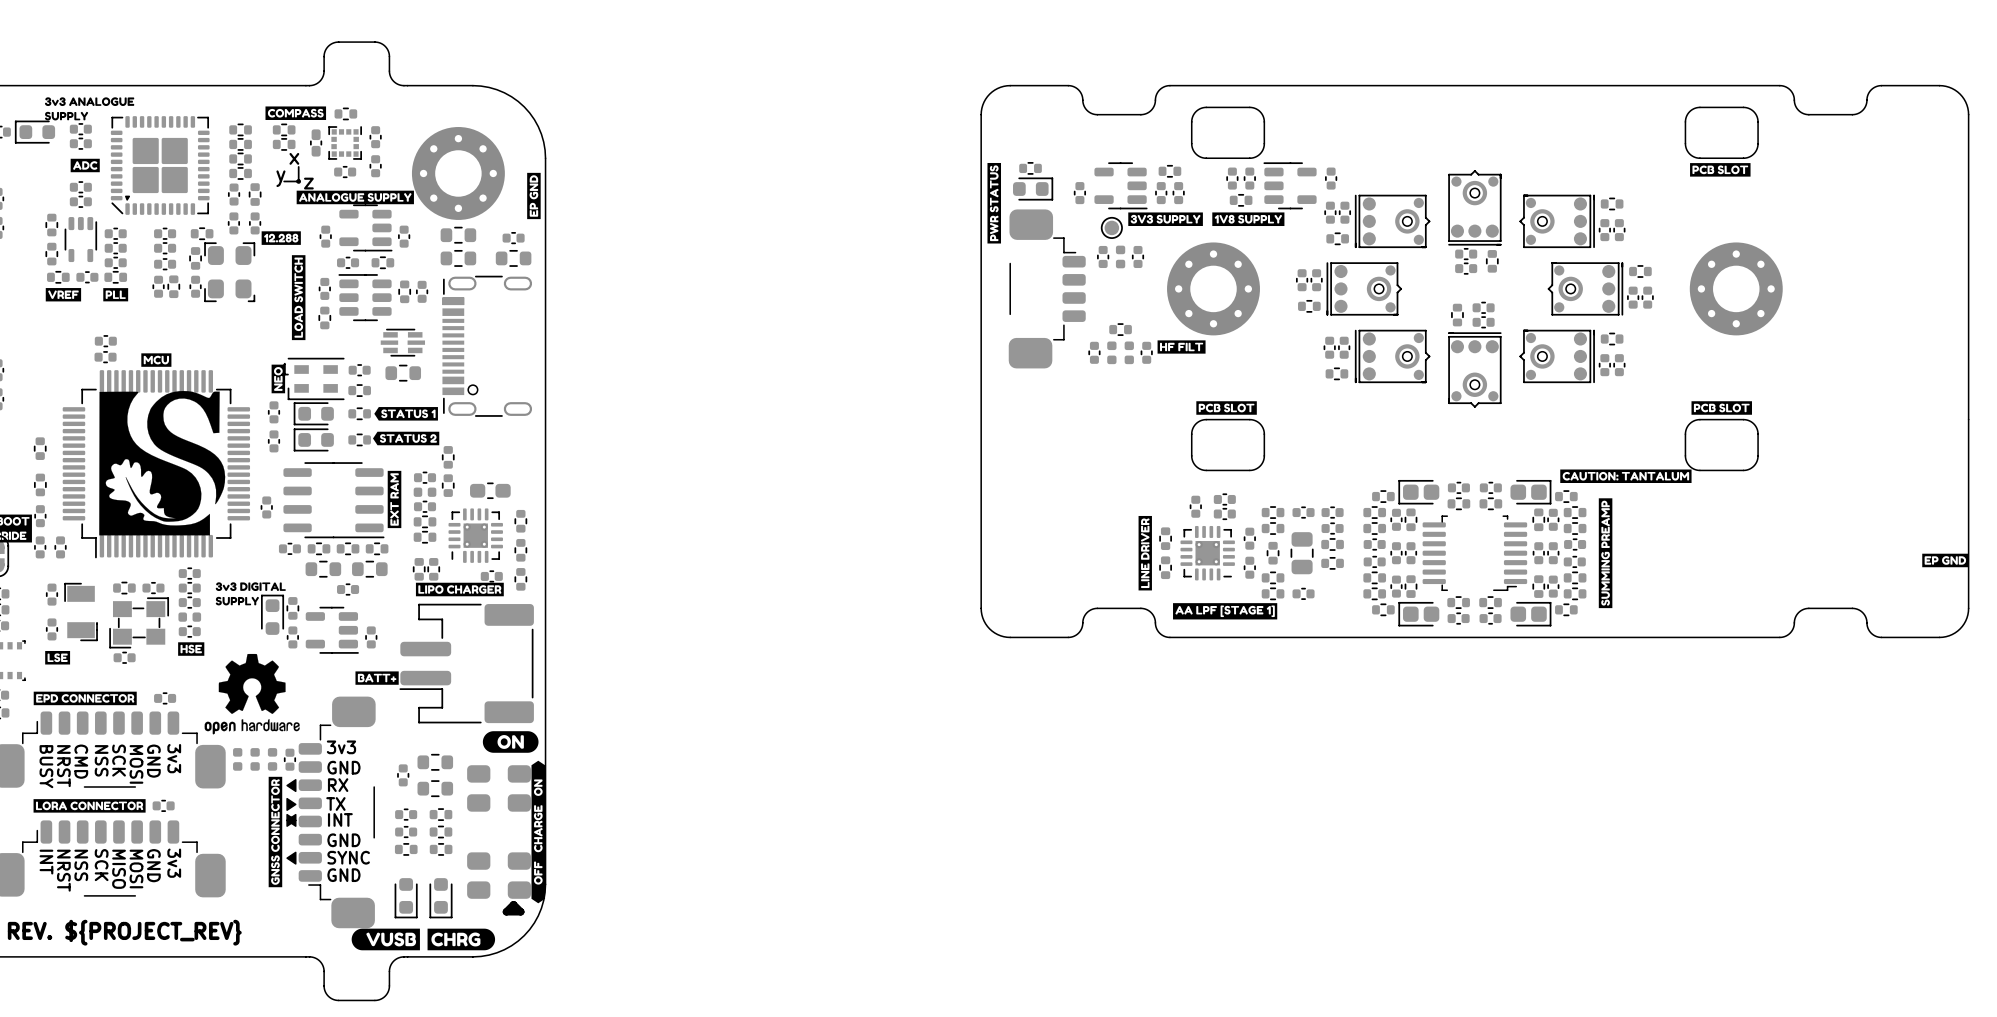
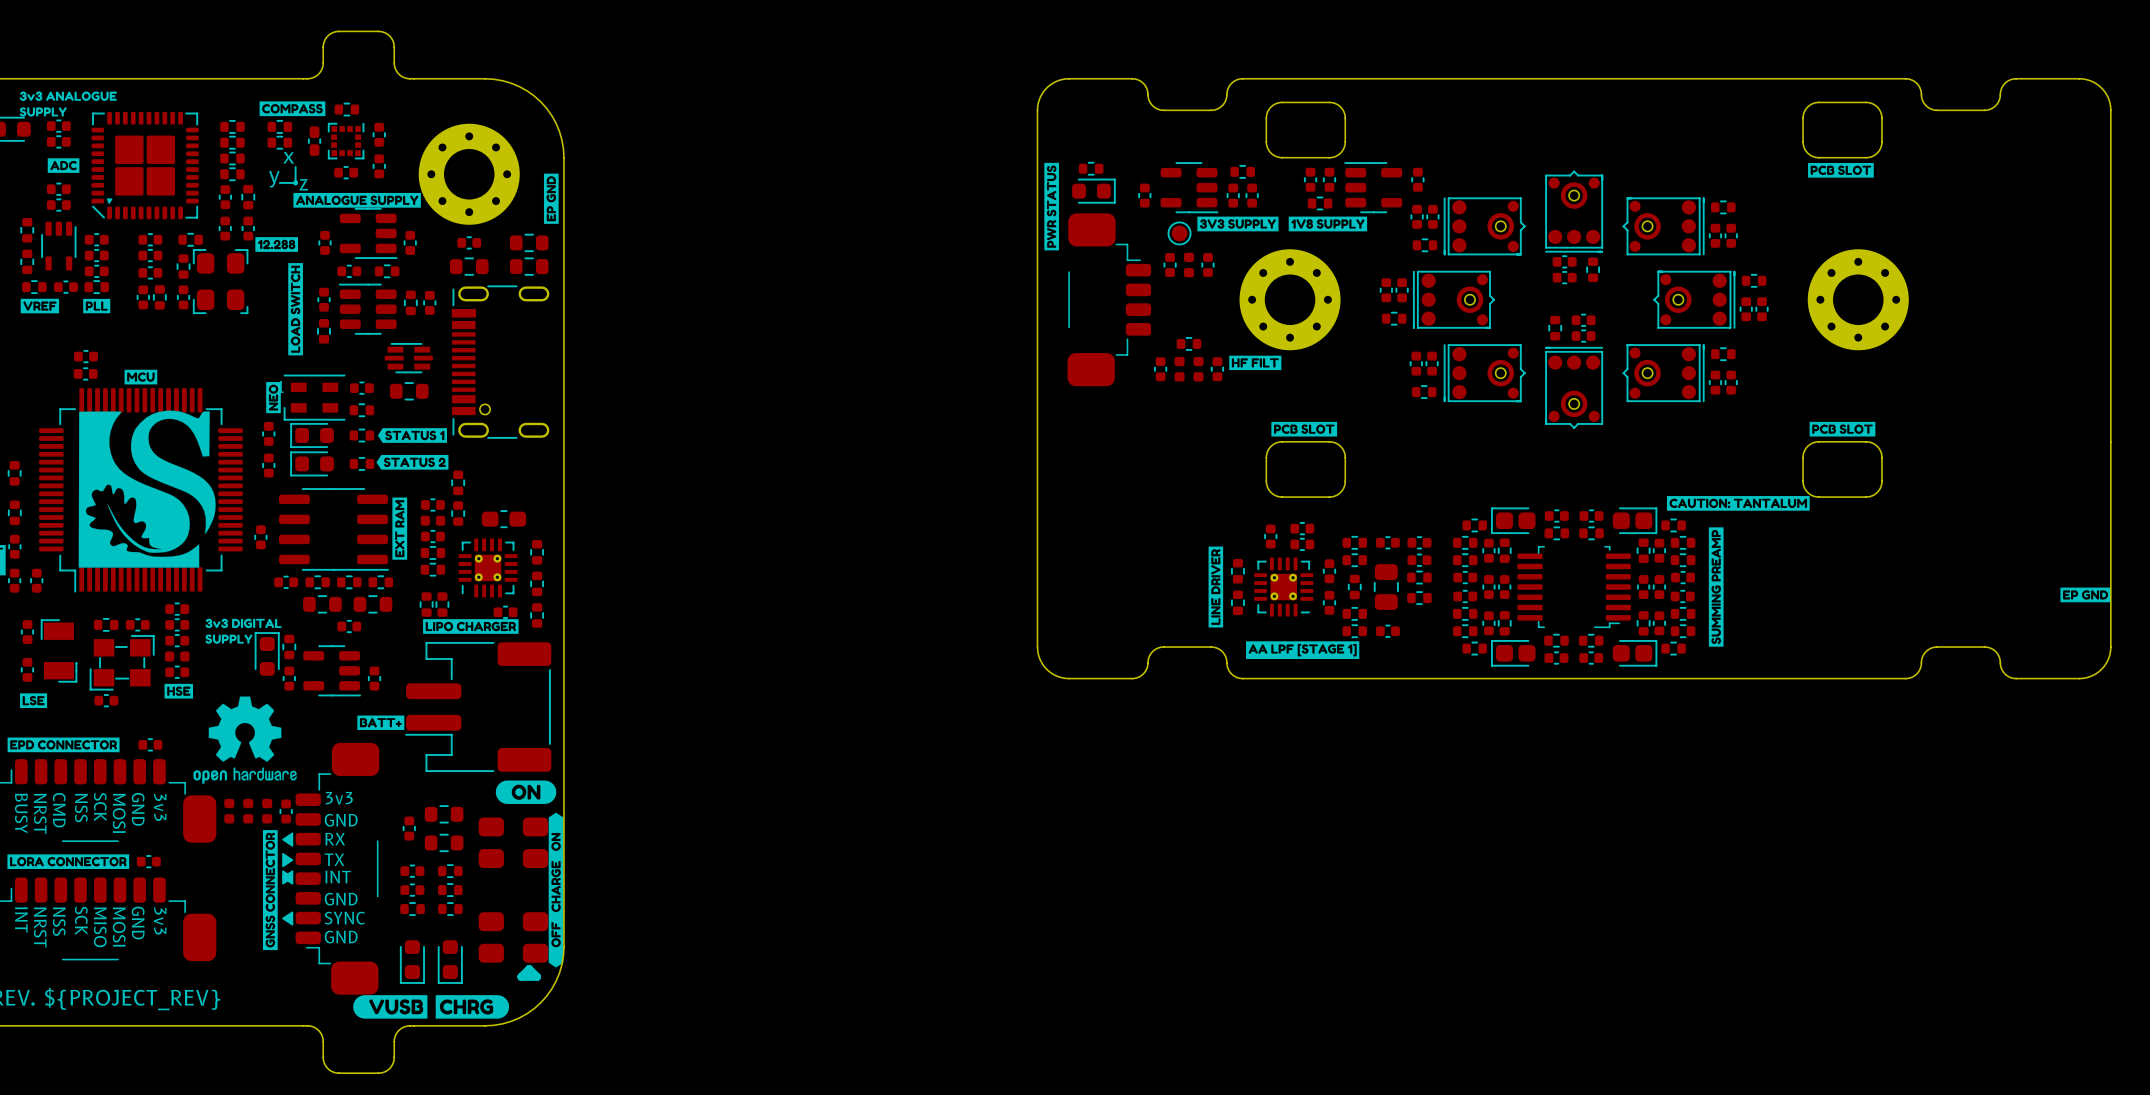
part footprint: [440, 226, 477, 244] -> [457, 236, 482, 250]
part footprint: [502, 232, 525, 245] -> [509, 233, 549, 253]

